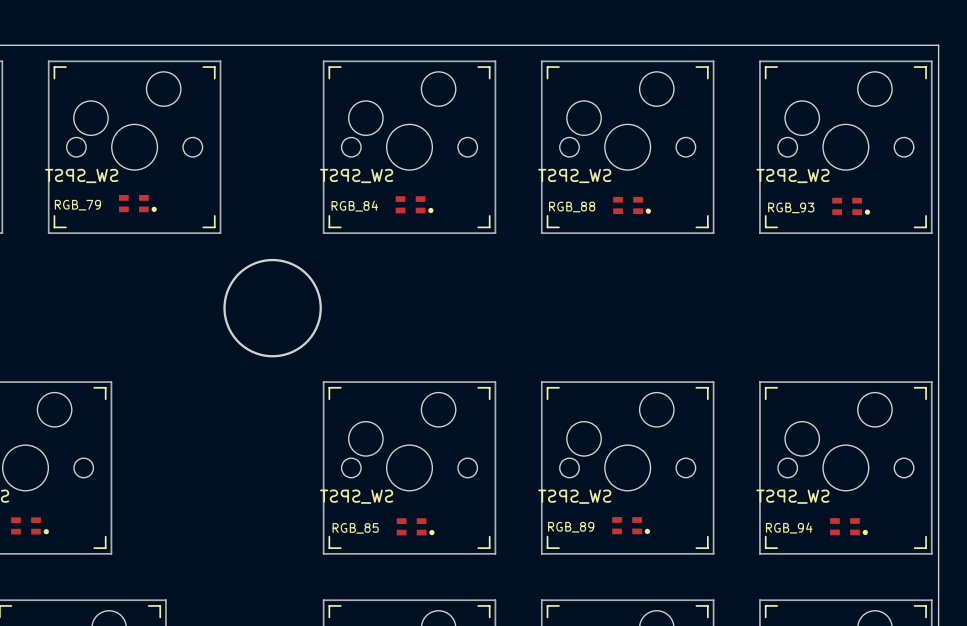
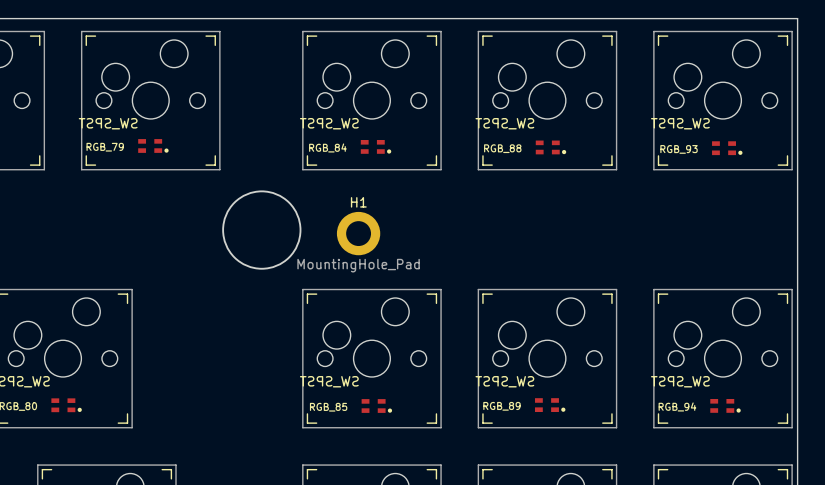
H1: none -> MountingHole_Pad (358, 233)

